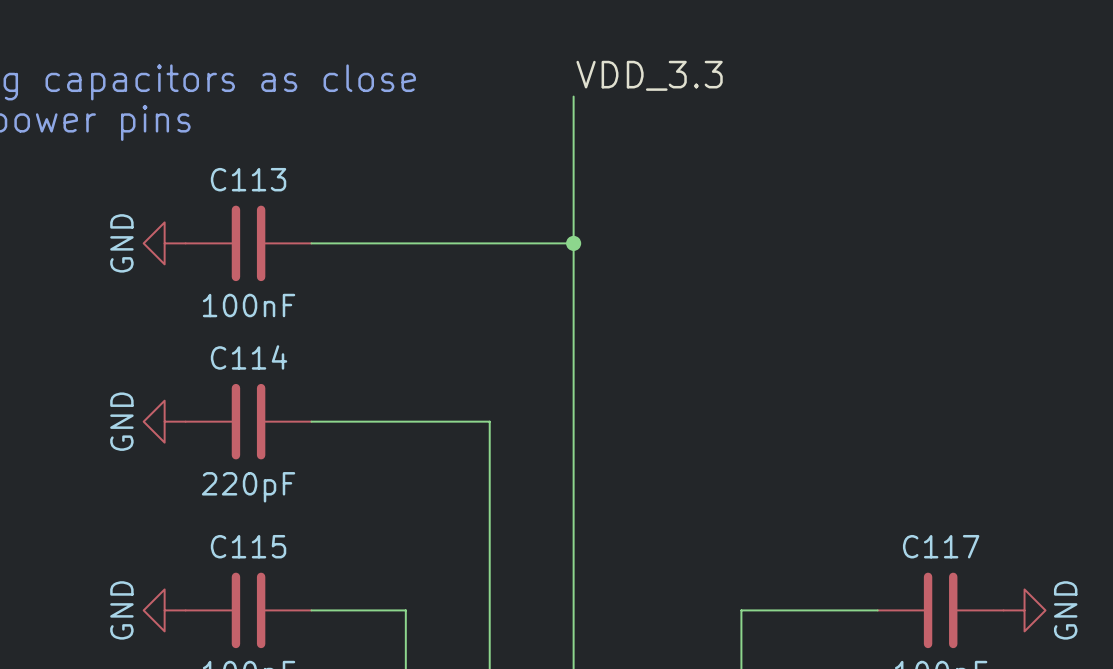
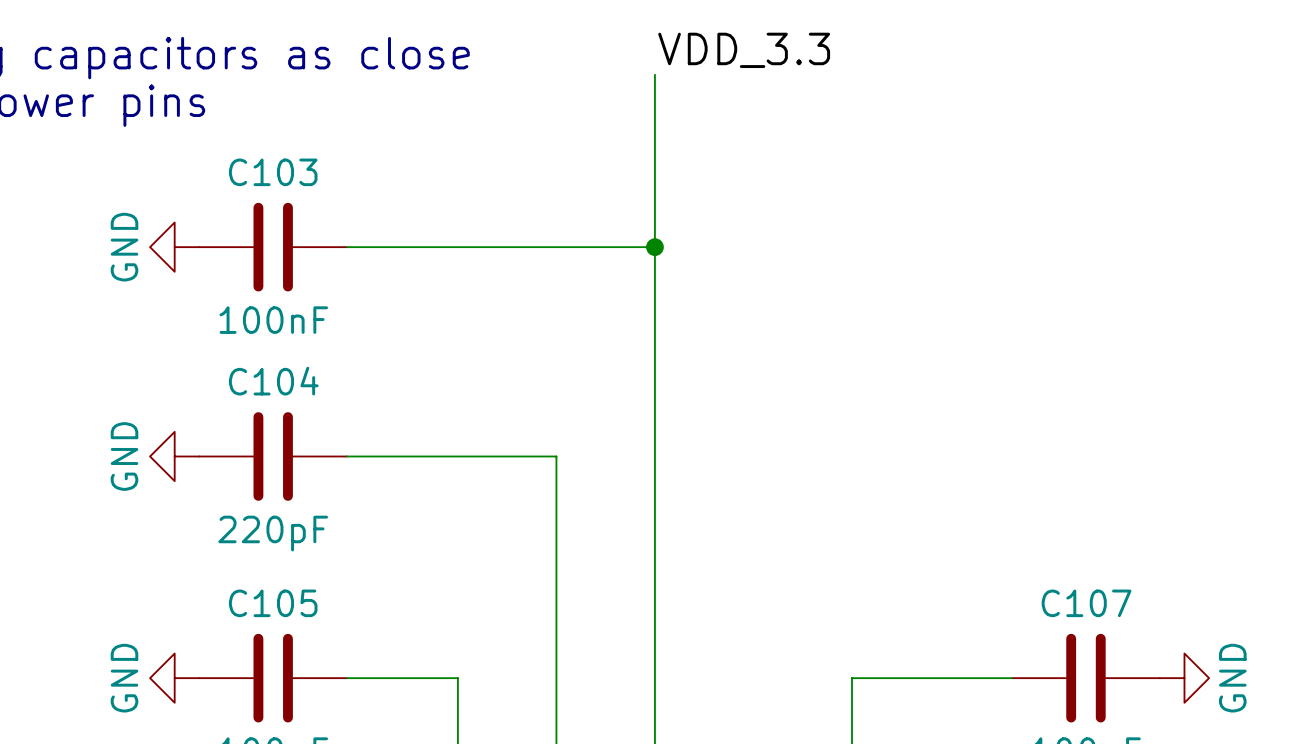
C113 name: C113 (248, 179) -> C103 (273, 172)
C114 name: C114 (249, 357) -> C104 (273, 381)
C115 name: C115 (248, 546) -> C105 (273, 603)
C117 name: C117 (941, 546) -> C107 (1086, 603)

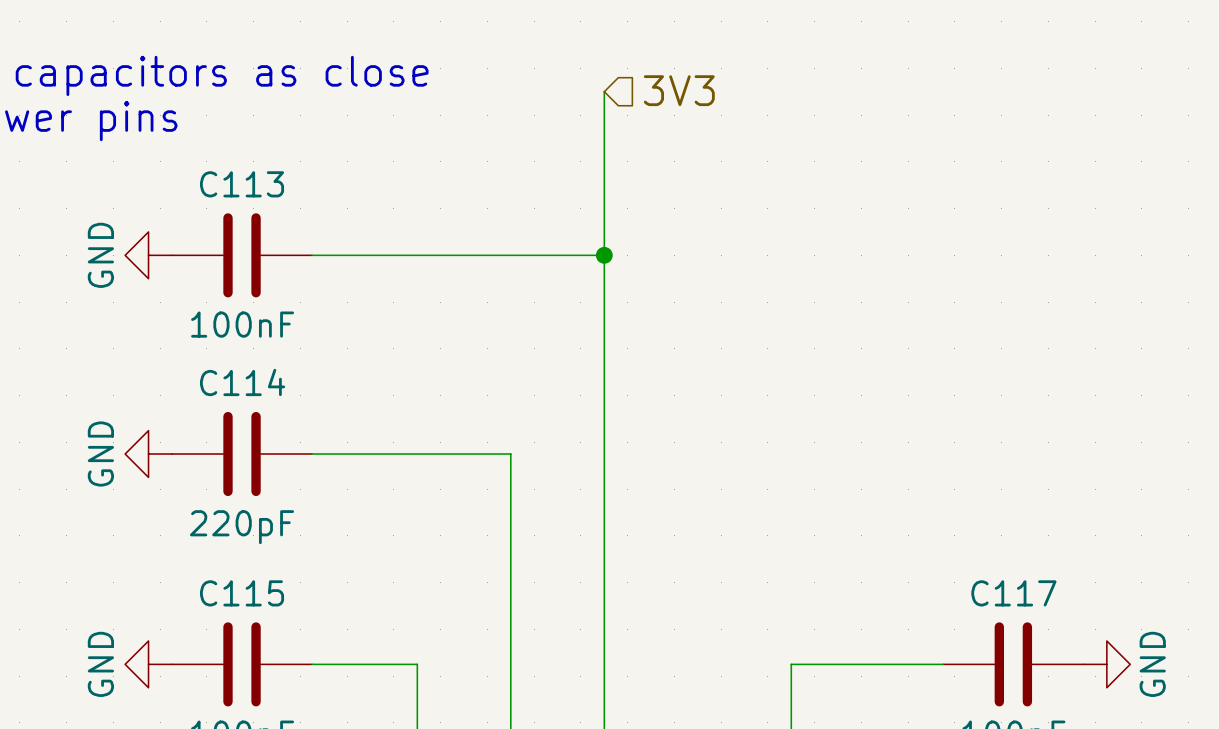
label: VDD_3.3 (744, 50) -> none
hierarchical label: none -> 3V3 (679, 90)
C103 name: C103 (273, 172) -> C113 (242, 184)
C104 name: C104 (273, 381) -> C114 (242, 382)
C105 name: C105 (273, 603) -> C115 (242, 593)
C107 name: C107 (1086, 603) -> C117 (1013, 593)

